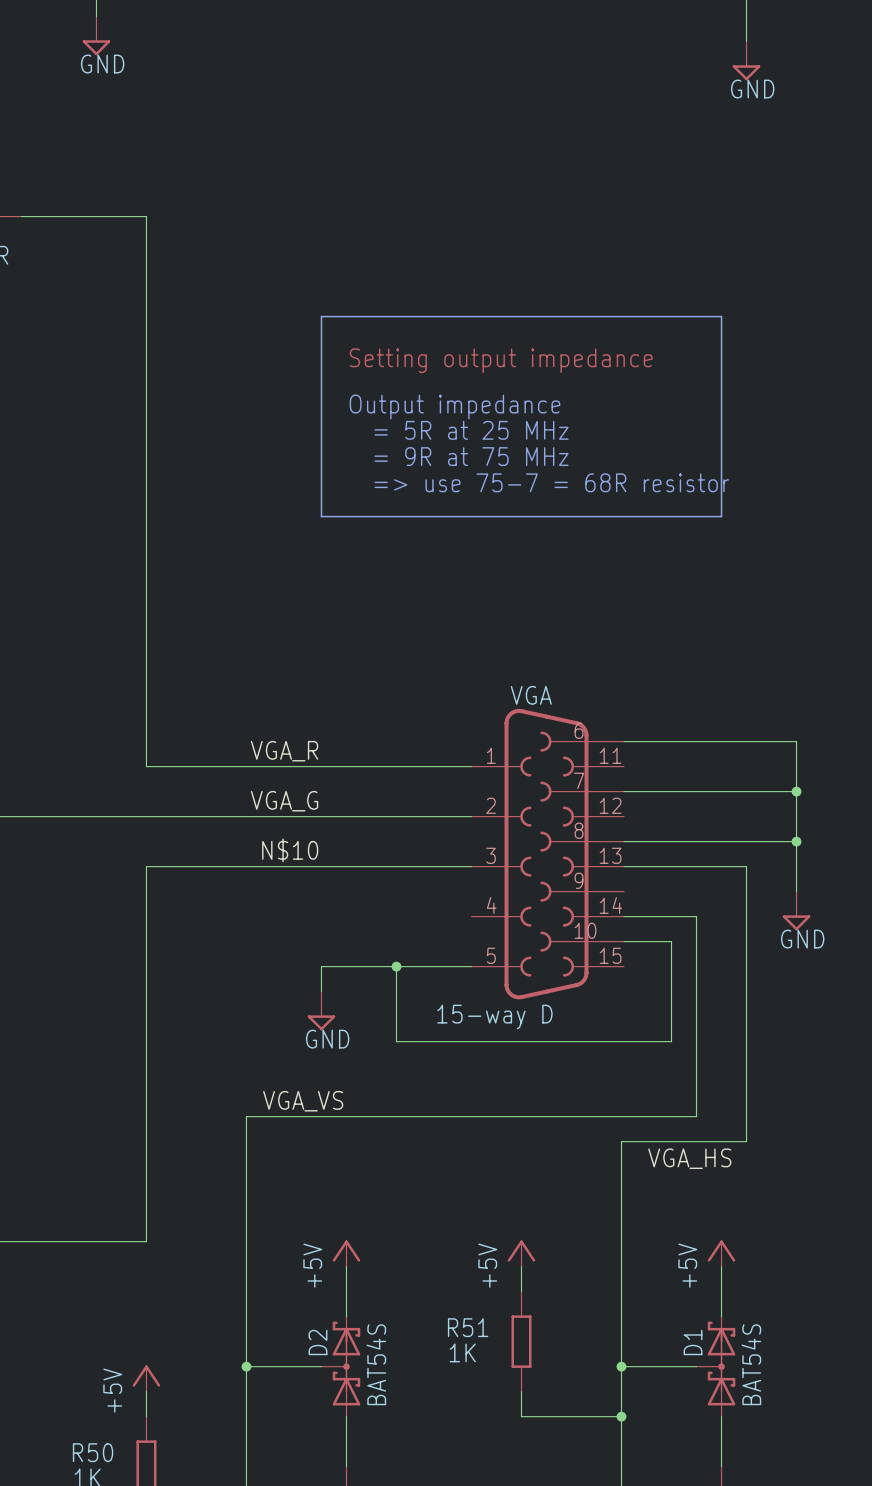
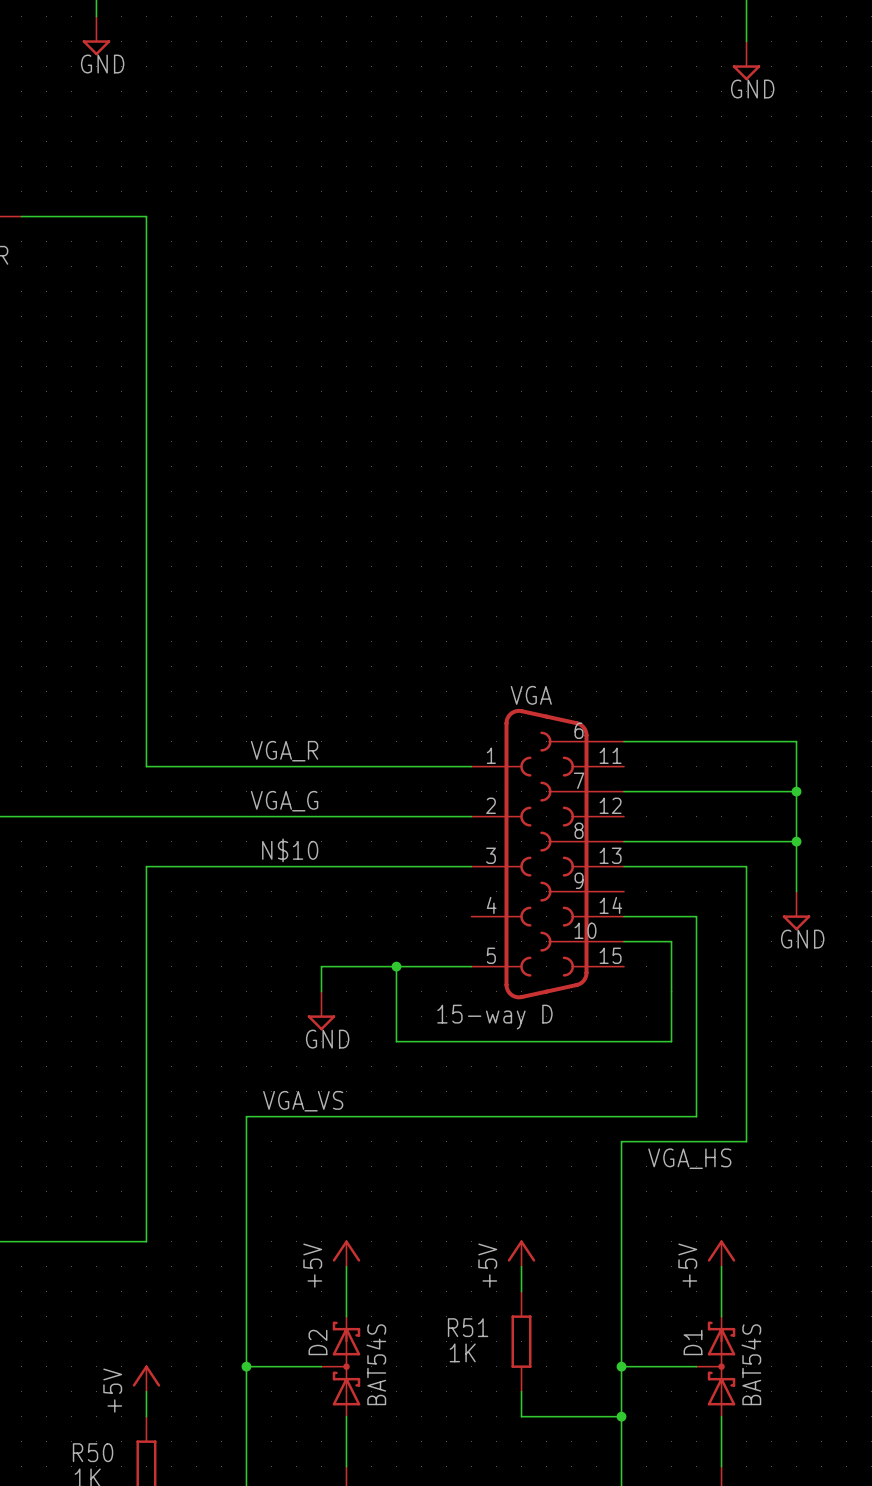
line: (321, 316) (721, 316) (721, 516) (321, 516) (321, 316) -> none
text: Setting output impedance (501, 360) -> none
text: Output impedance (455, 406) -> none
text: = 5R at 25 MHz (471, 430) -> none
text: = 9R at 75 MHz (471, 456) -> none
text: => use 75-7 = 68R resistor (551, 482) -> none

